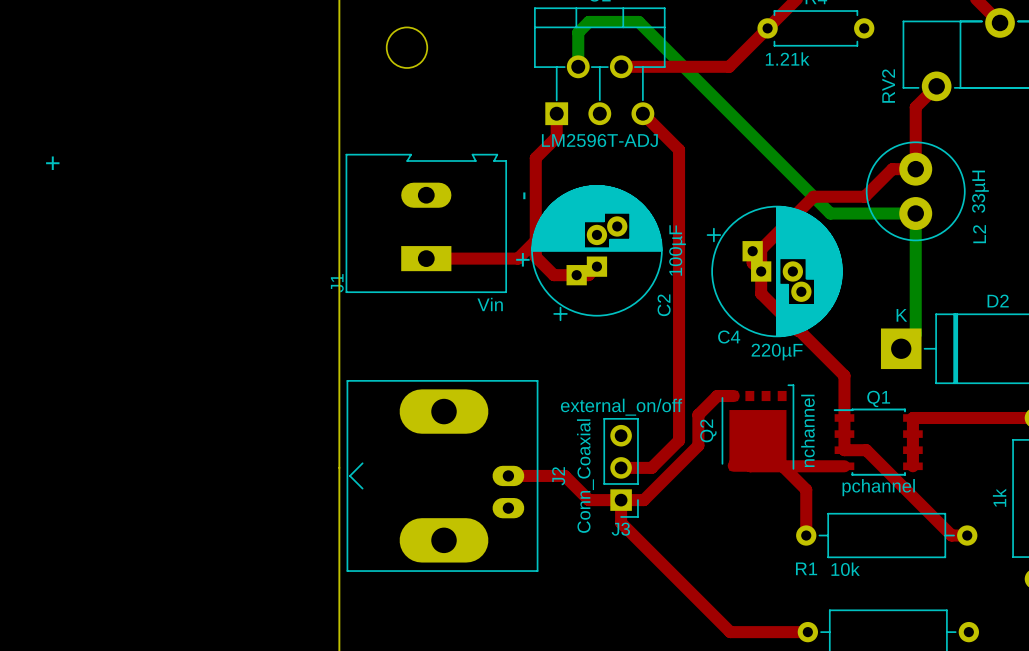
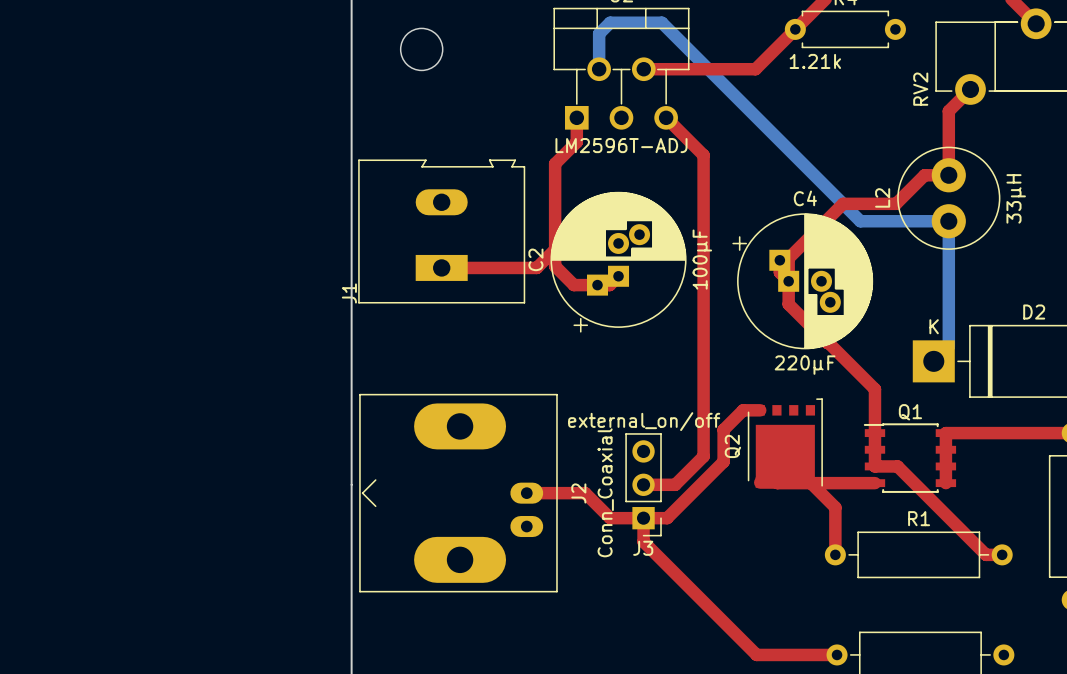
text: + (52, 163) -> none
text: - (524, 195) -> none
L2 name position: L2 (979, 234) -> L2 (882, 197)
text: + (522, 259) -> none
J1 value: Vin (490, 304) -> none
C2 name position: C2 (664, 305) -> C2 (535, 259)
C4 name position: C4 (729, 337) -> C4 (805, 198)
Q2 value: nchannel (807, 430) -> none
Q1 value: pchannel (878, 487) -> none
part value: 1k (999, 497) -> none
R1 name position: R1 (806, 568) -> R1 (919, 518)
R1 value: 10k (845, 569) -> none

